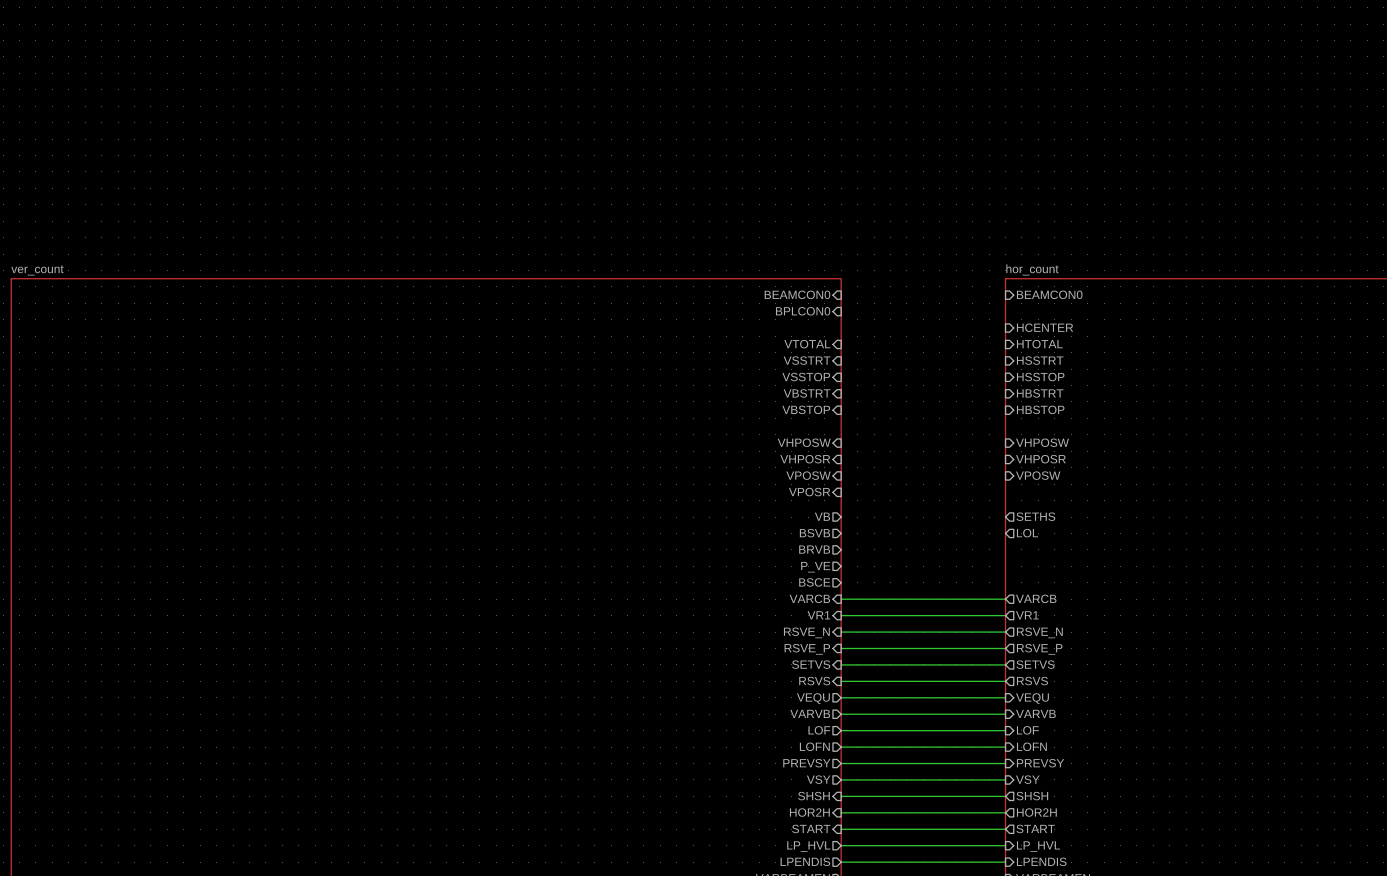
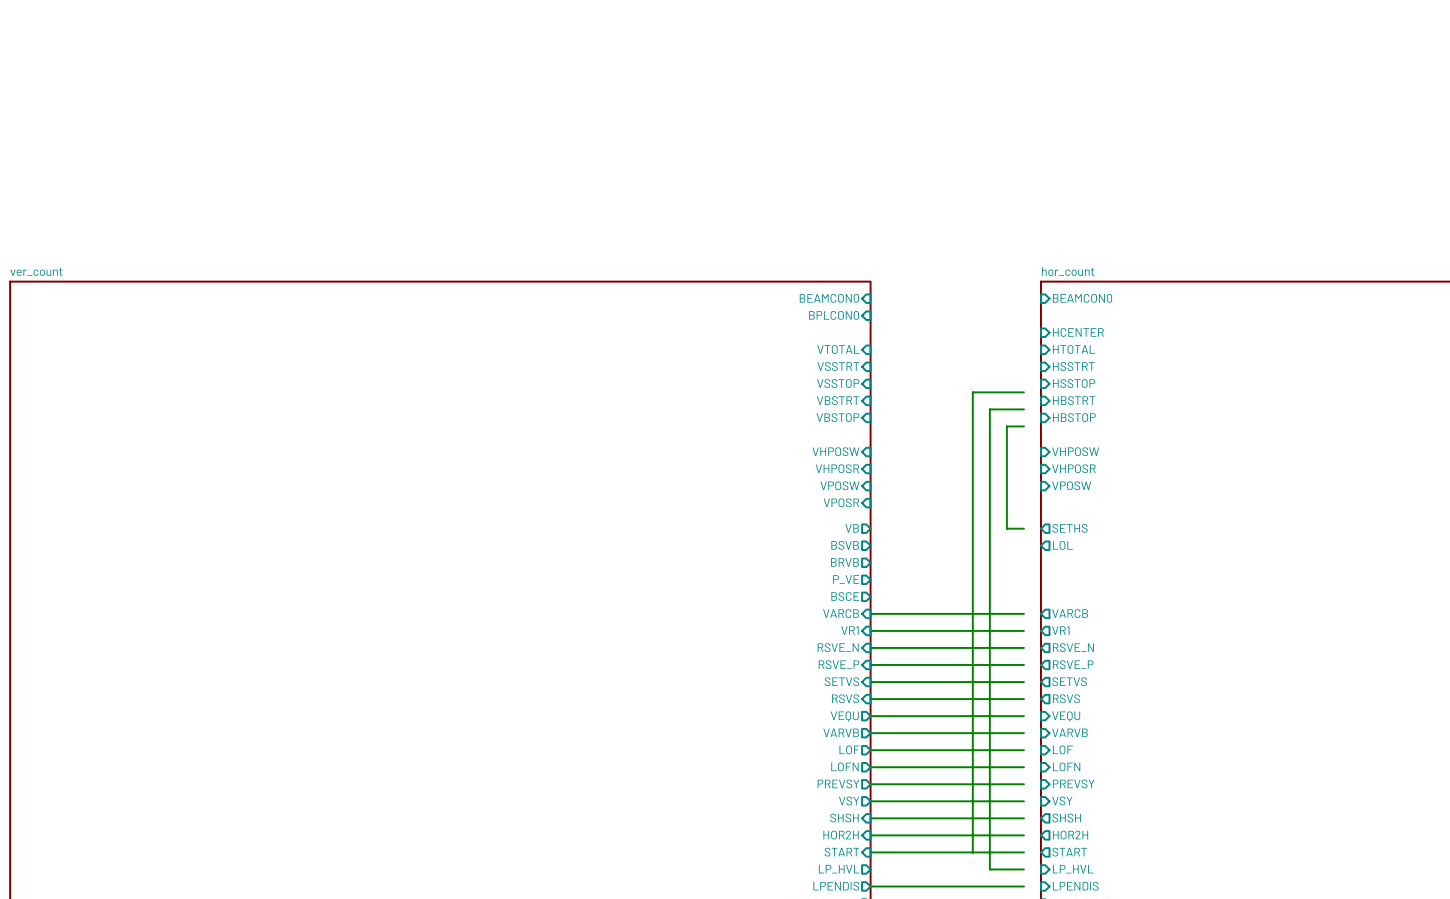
wire: none -> (1023, 392) (972, 392) (972, 852)
wire: none -> (1023, 426) (1006, 426) (1006, 528) (1023, 528)
wire: (989, 599) (1005, 599) -> none
wire: (989, 615) (1005, 615) -> none
wire: (989, 632) (1005, 632) -> none
wire: (989, 648) (1005, 648) -> none
wire: (989, 664) (1005, 664) -> none
wire: (989, 681) (1005, 681) -> none
wire: (989, 697) (1005, 697) -> none
wire: (989, 714) (1005, 714) -> none
wire: (989, 730) (1005, 730) -> none
wire: (989, 747) (1005, 747) -> none
wire: (989, 763) (1005, 763) -> none
wire: (989, 779) (1005, 779) -> none
wire: (989, 796) (1005, 796) -> none
wire: (989, 812) (1005, 812) -> none
wire: (989, 829) (1005, 829) -> none
wire: (841, 845) (956, 845) -> (1023, 409) (989, 409) (989, 869)
wire: (989, 845) (1005, 845) -> none
wire: (989, 862) (1005, 862) -> none

